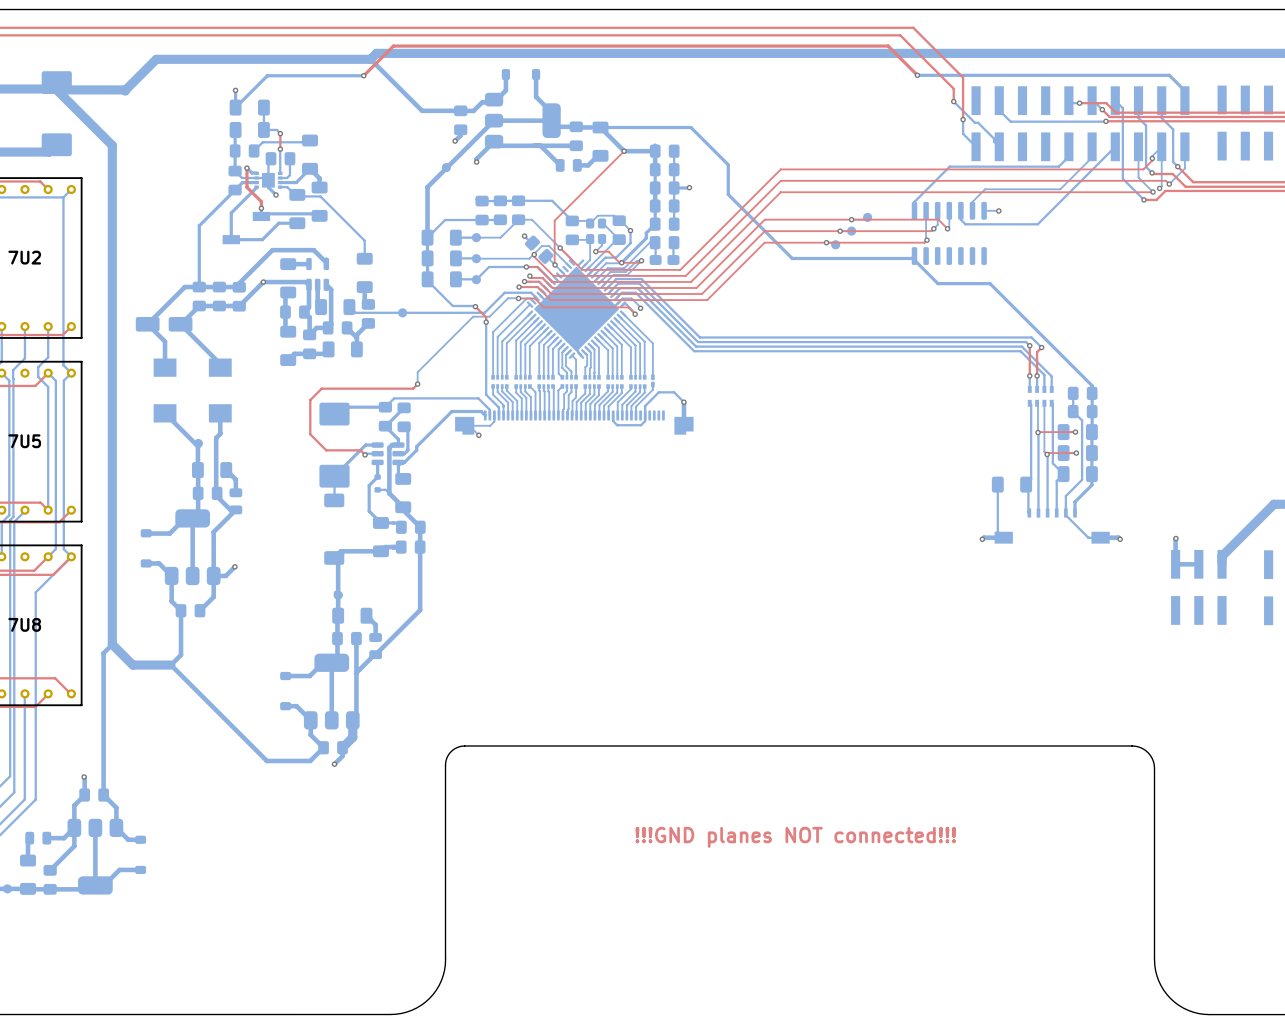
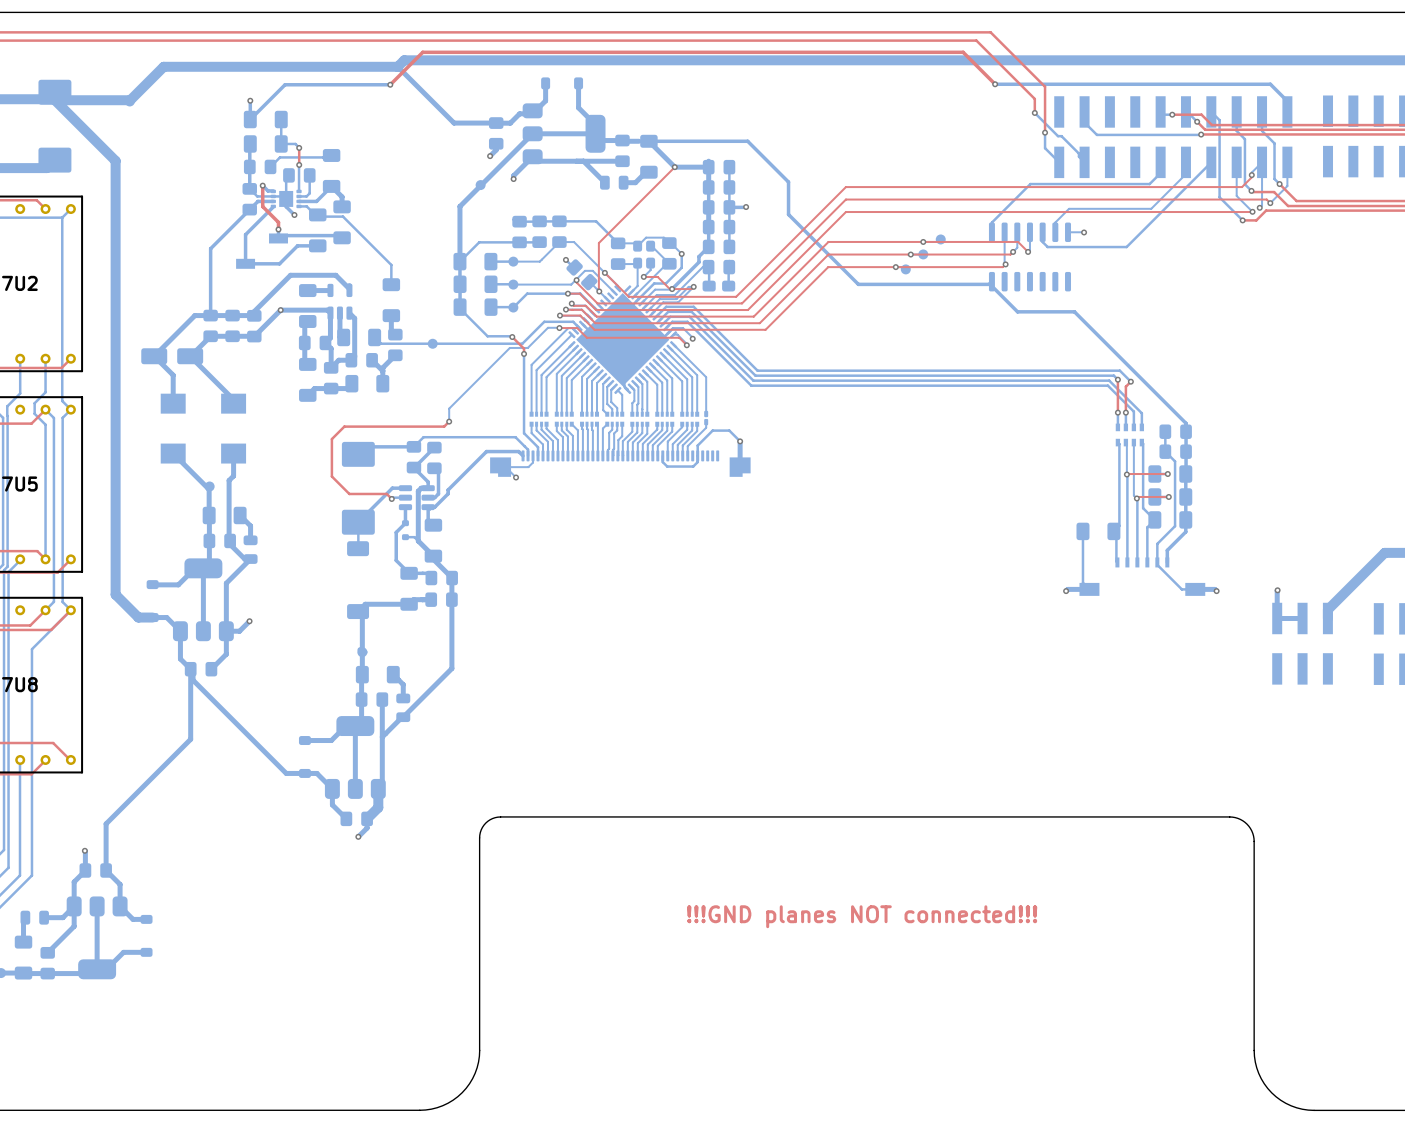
bottom track: (112, 542) (112, 644) -> (115, 594) (138, 617) (152, 617)
bottom track: none -> (190, 671) (193, 673) (193, 680) (286, 773) (304, 773)
bottom track: (112, 644) (103, 653) (103, 752) -> (190, 717) (190, 739) (106, 823)
bottom track: (112, 644) (132, 665) (170, 665) -> none
bottom track: (181, 654) (170, 665) -> none
bottom track: (170, 665) (266, 760) (310, 760) (323, 747) -> none

